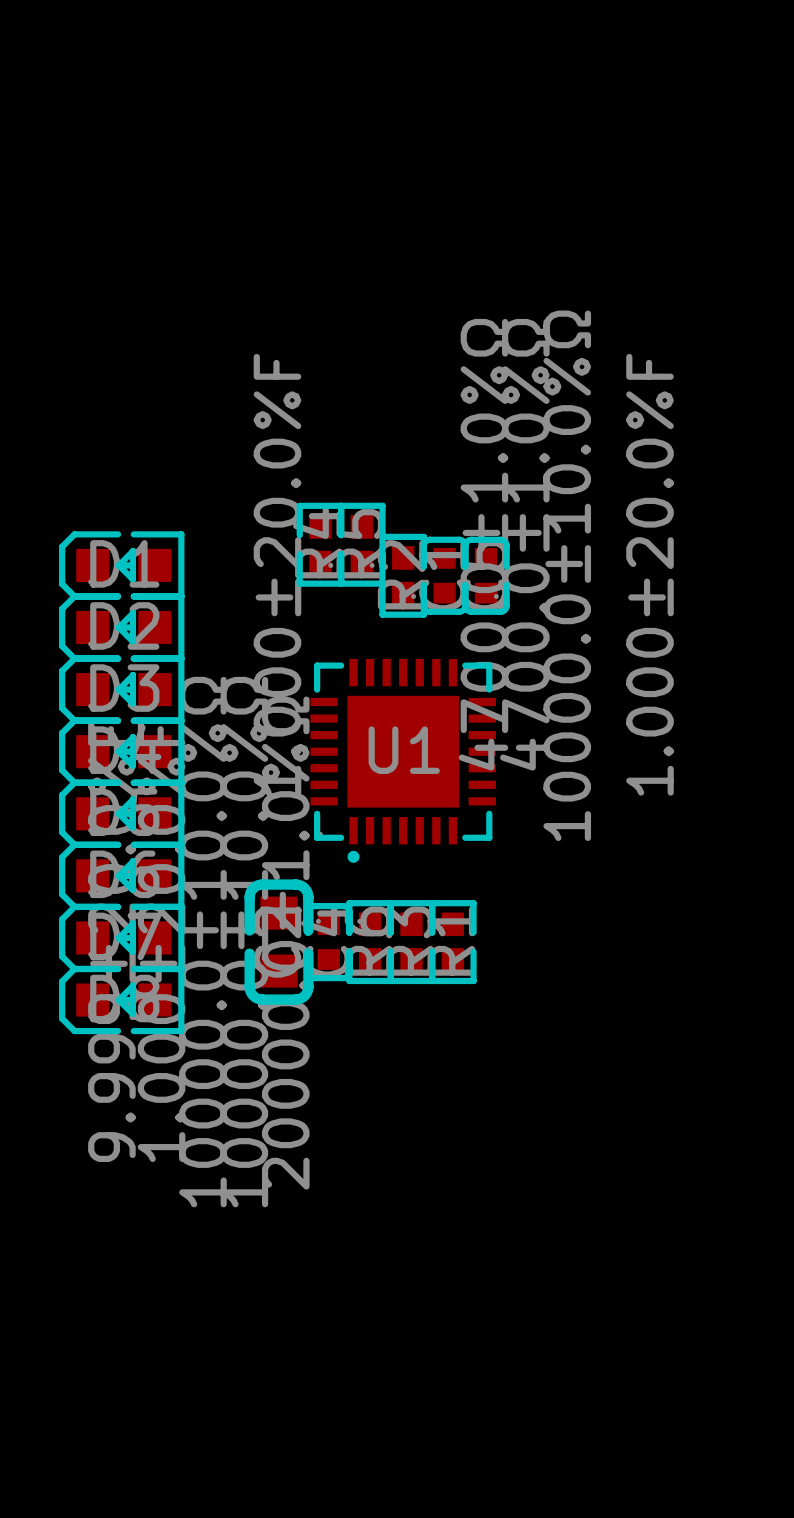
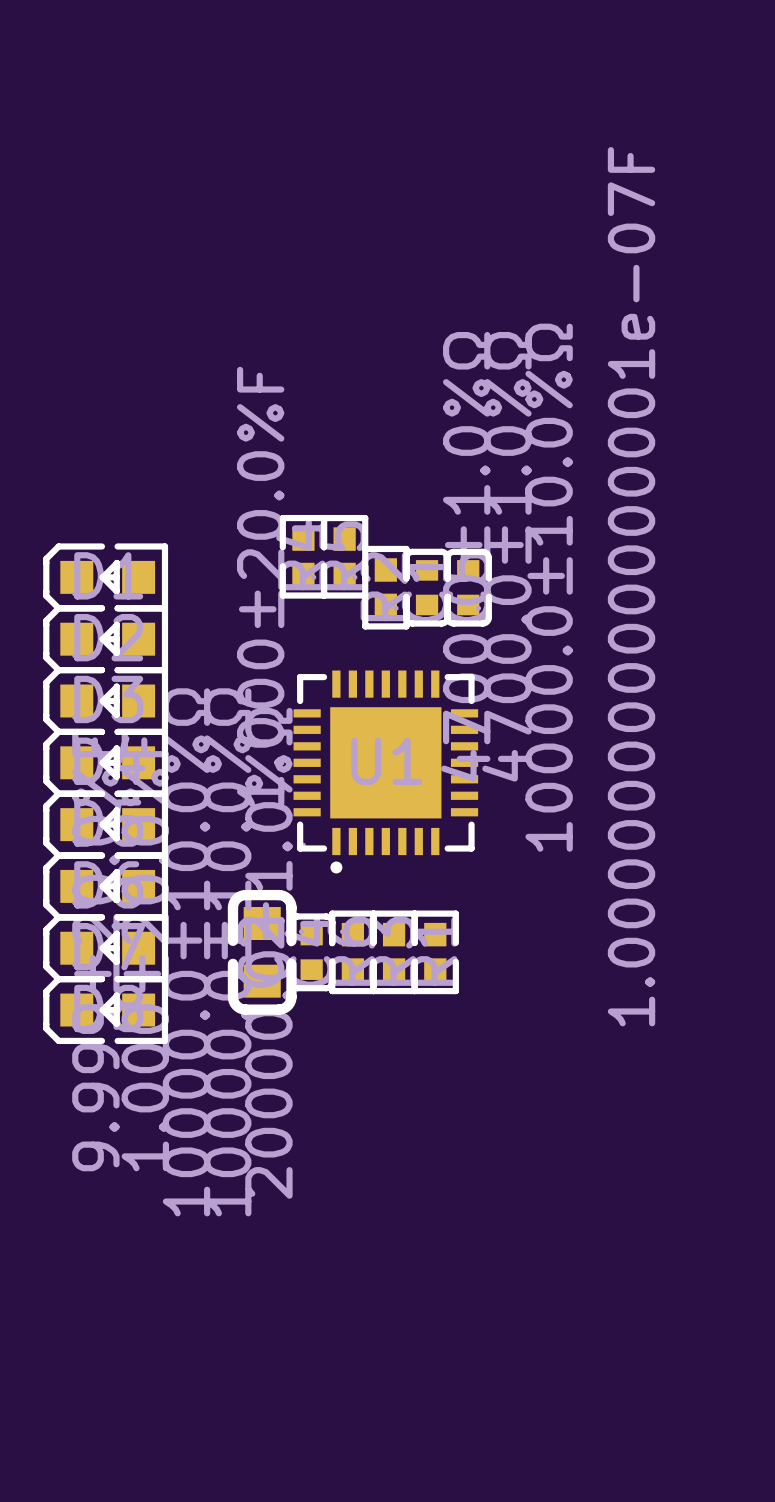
part value: 1.000±20.0%F (650, 574) -> 1.0000000000000001e-07F (631, 586)

